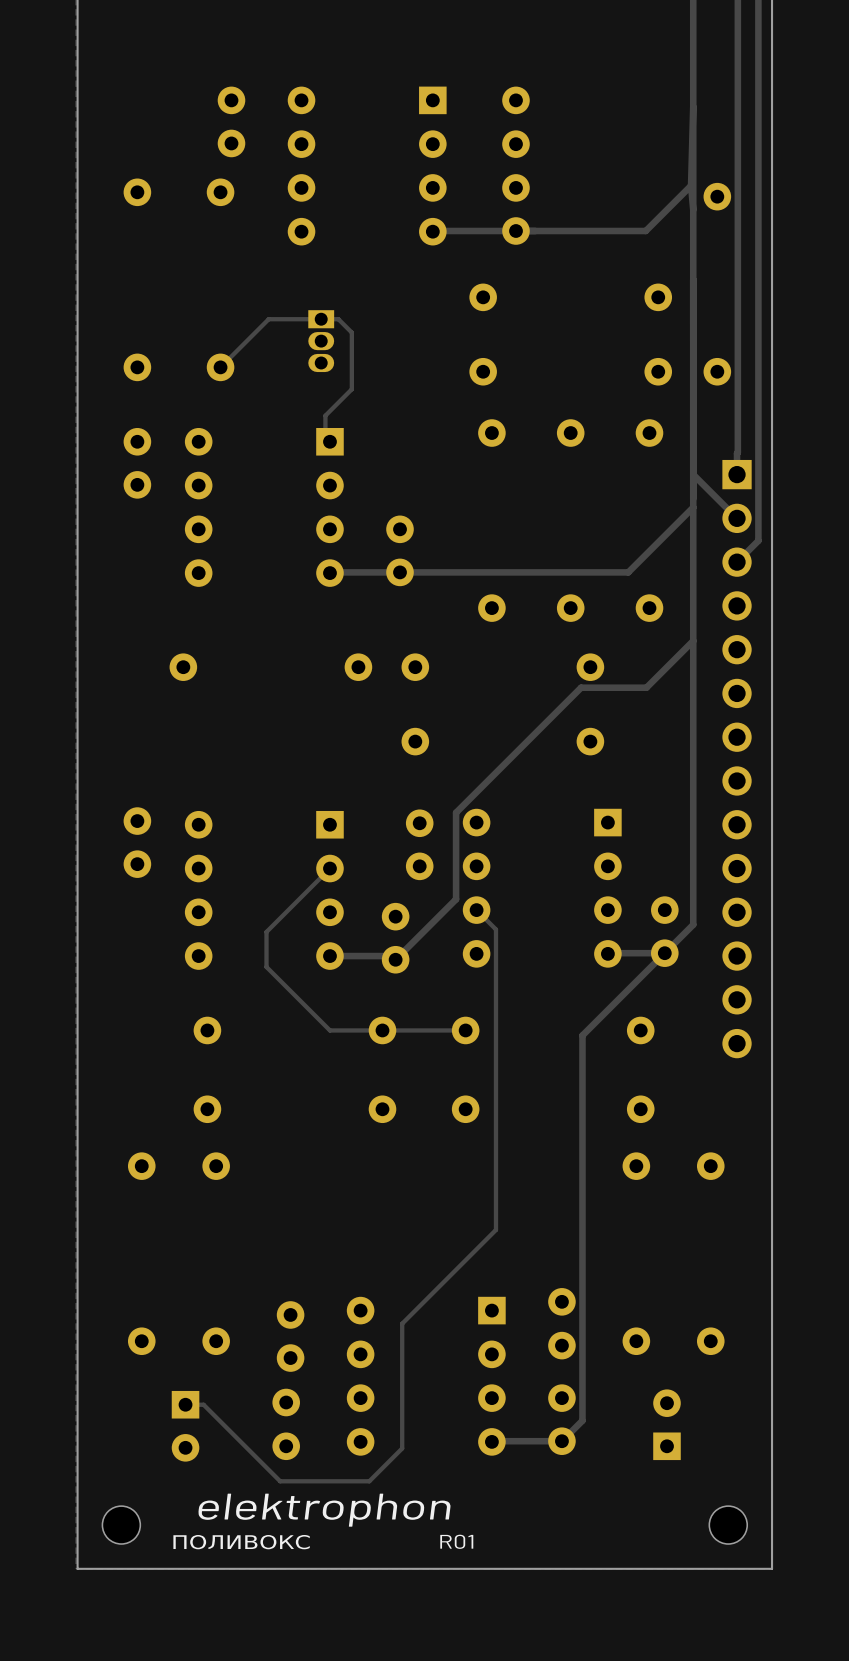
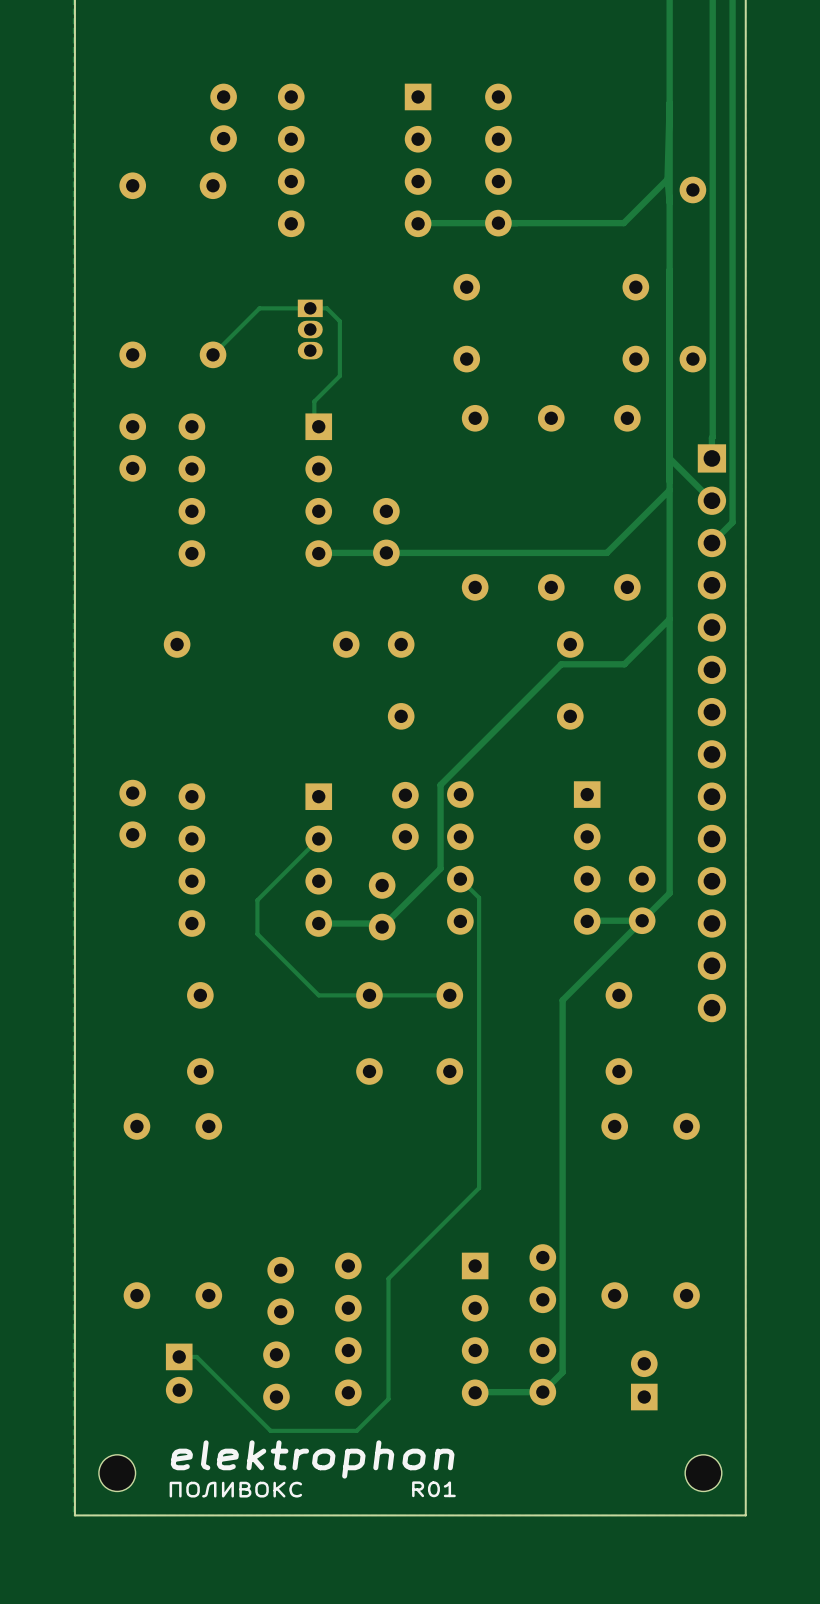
part footprint: [653, 1389, 681, 1461] -> [630, 1350, 658, 1411]
part footprint: [171, 1390, 200, 1462] -> [165, 1343, 193, 1404]

